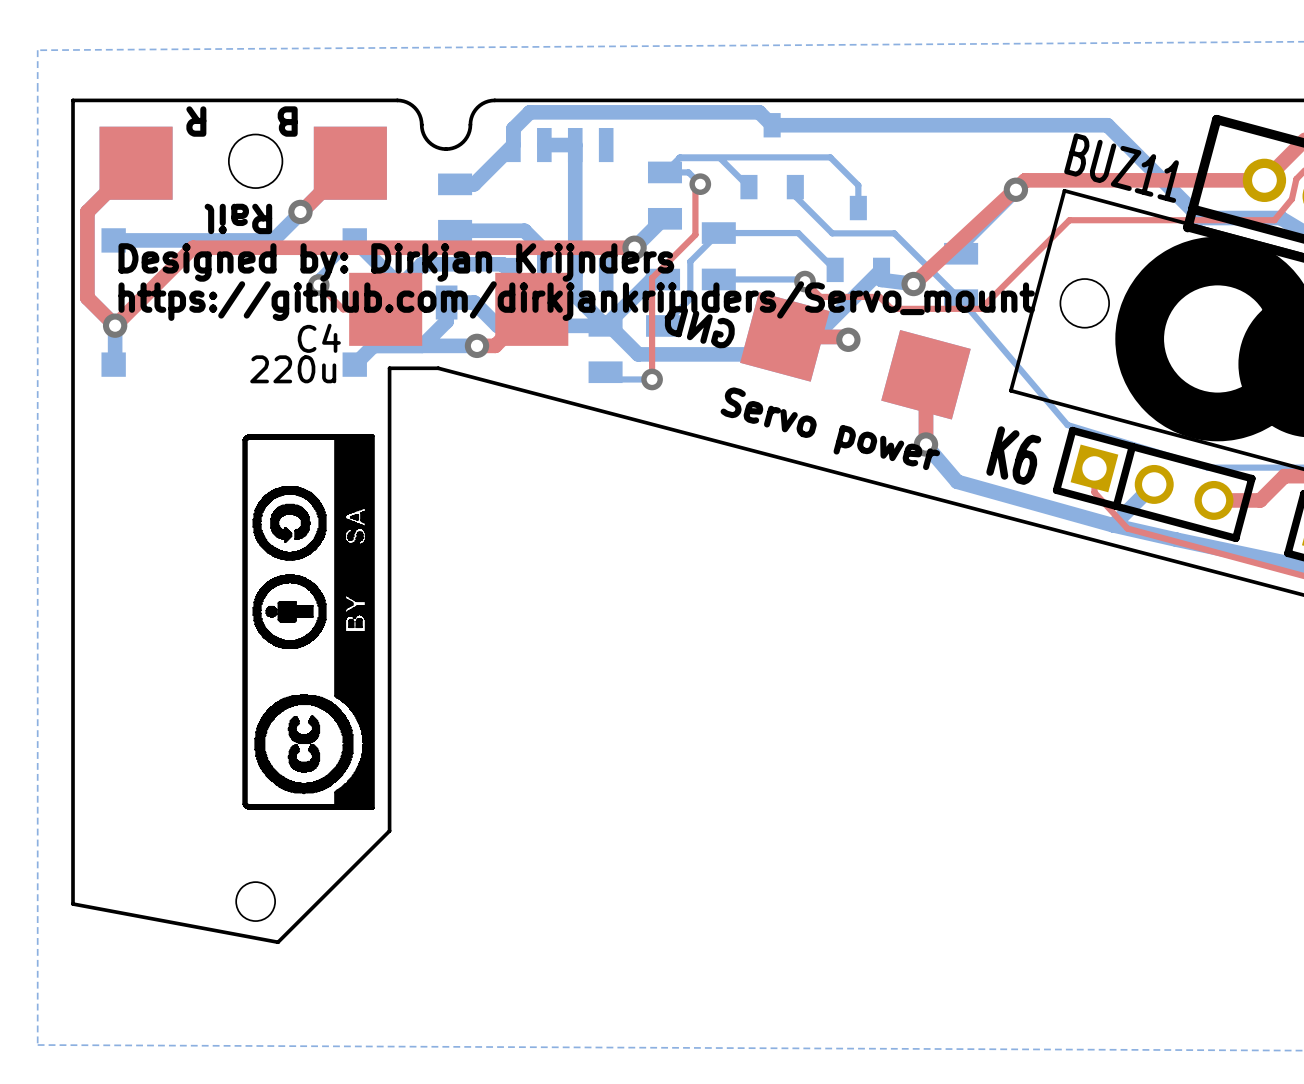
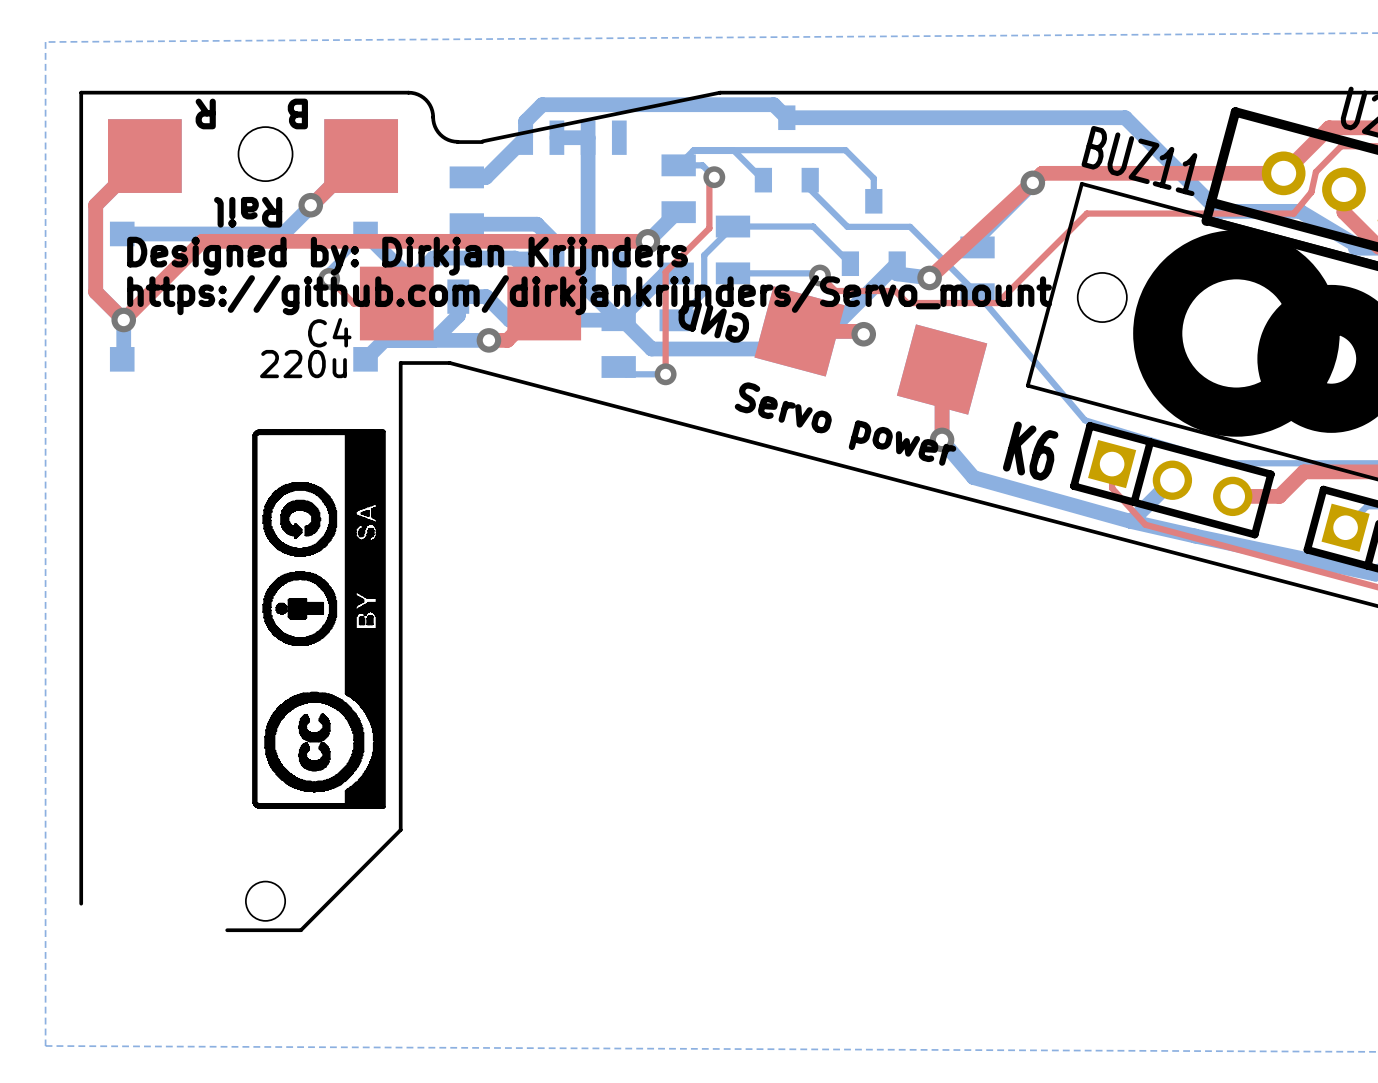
board edge: (706, 100) (491, 100) (482, 103) (475, 109) (471, 118) (468, 134) (463, 141) (455, 147) (446, 149) -> (720, 92) (482, 141)
board edge: none -> (457, 142) (482, 142)
board edge: (389, 830) (278, 942) (73, 904) -> (400, 829) (300, 930) (227, 930)

